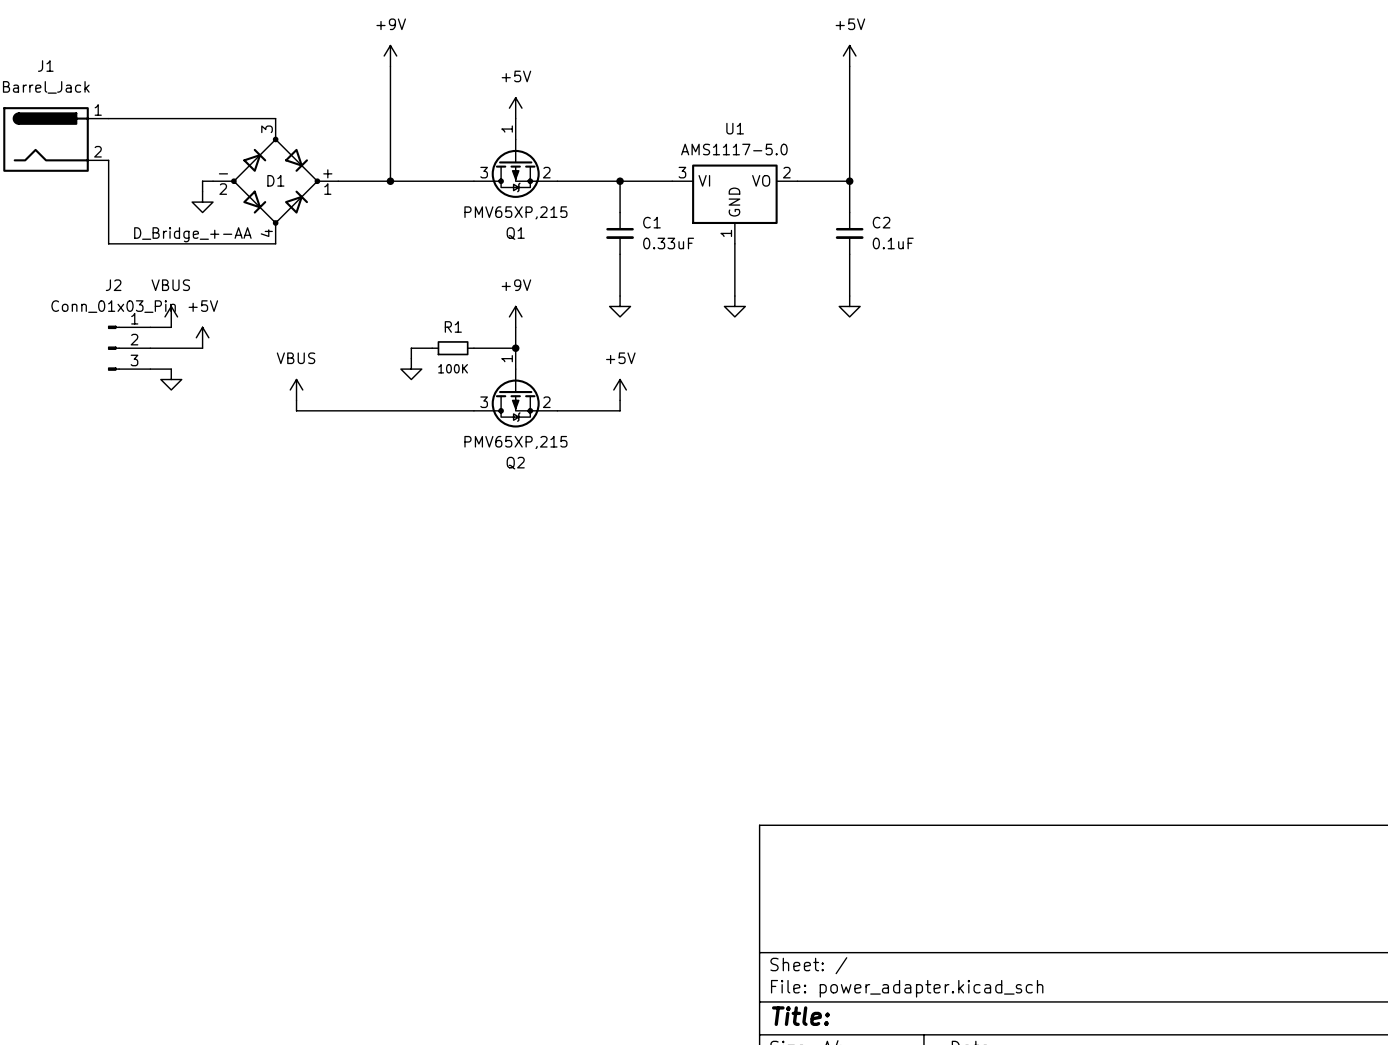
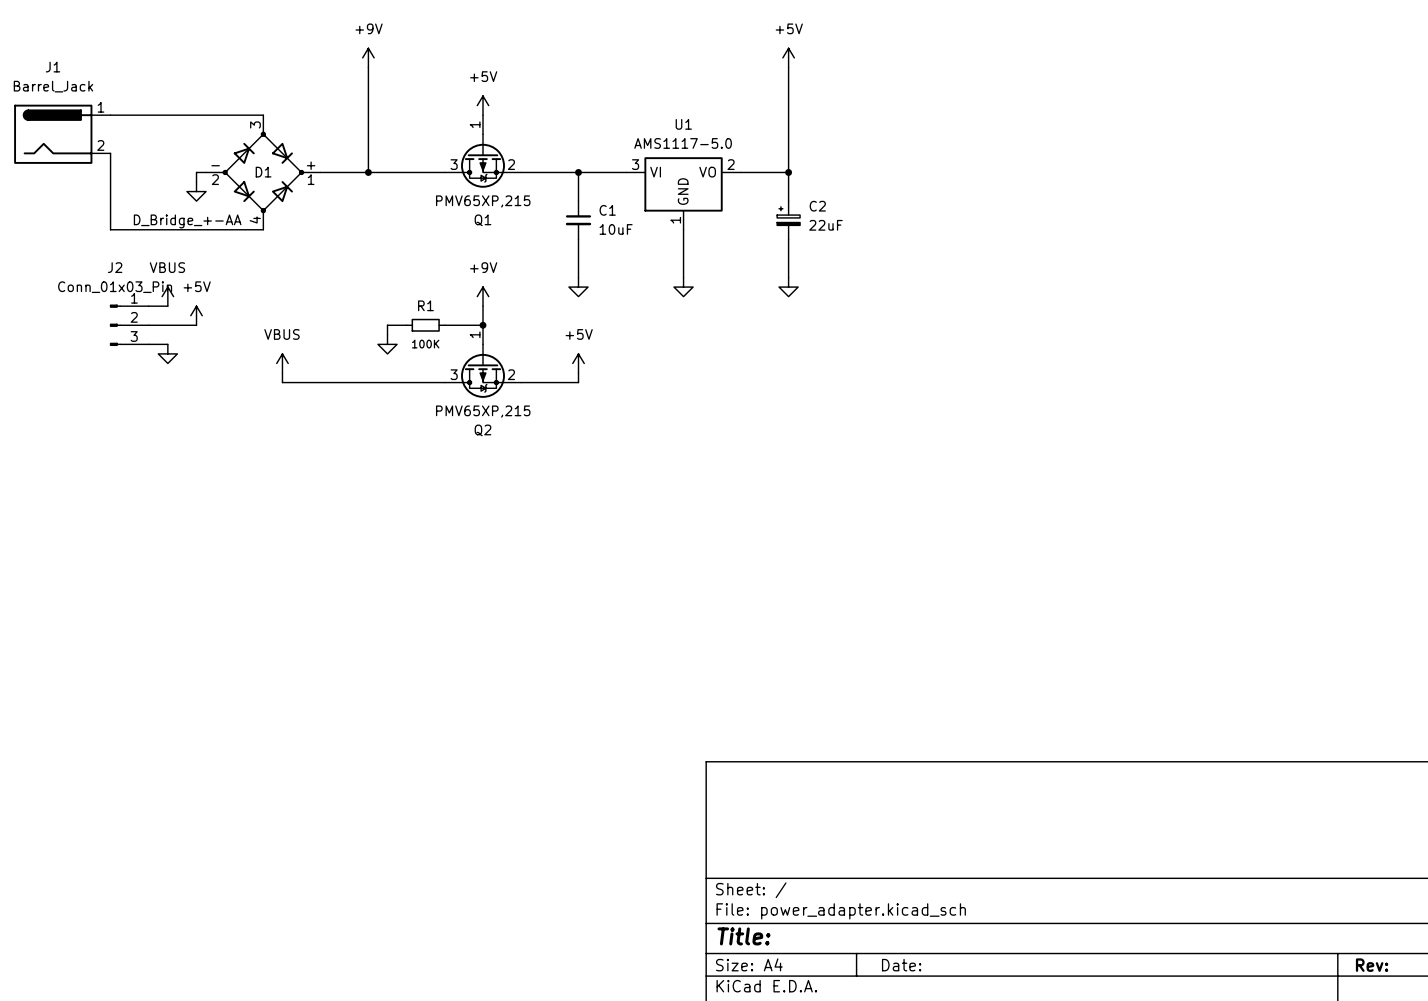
C2 symbol: [835, 212, 864, 255] -> [777, 201, 801, 240]
C1 value: 0.33uF (668, 243) -> 10uF (616, 229)
C2 value: 0.1uF (893, 243) -> 22uF (825, 225)

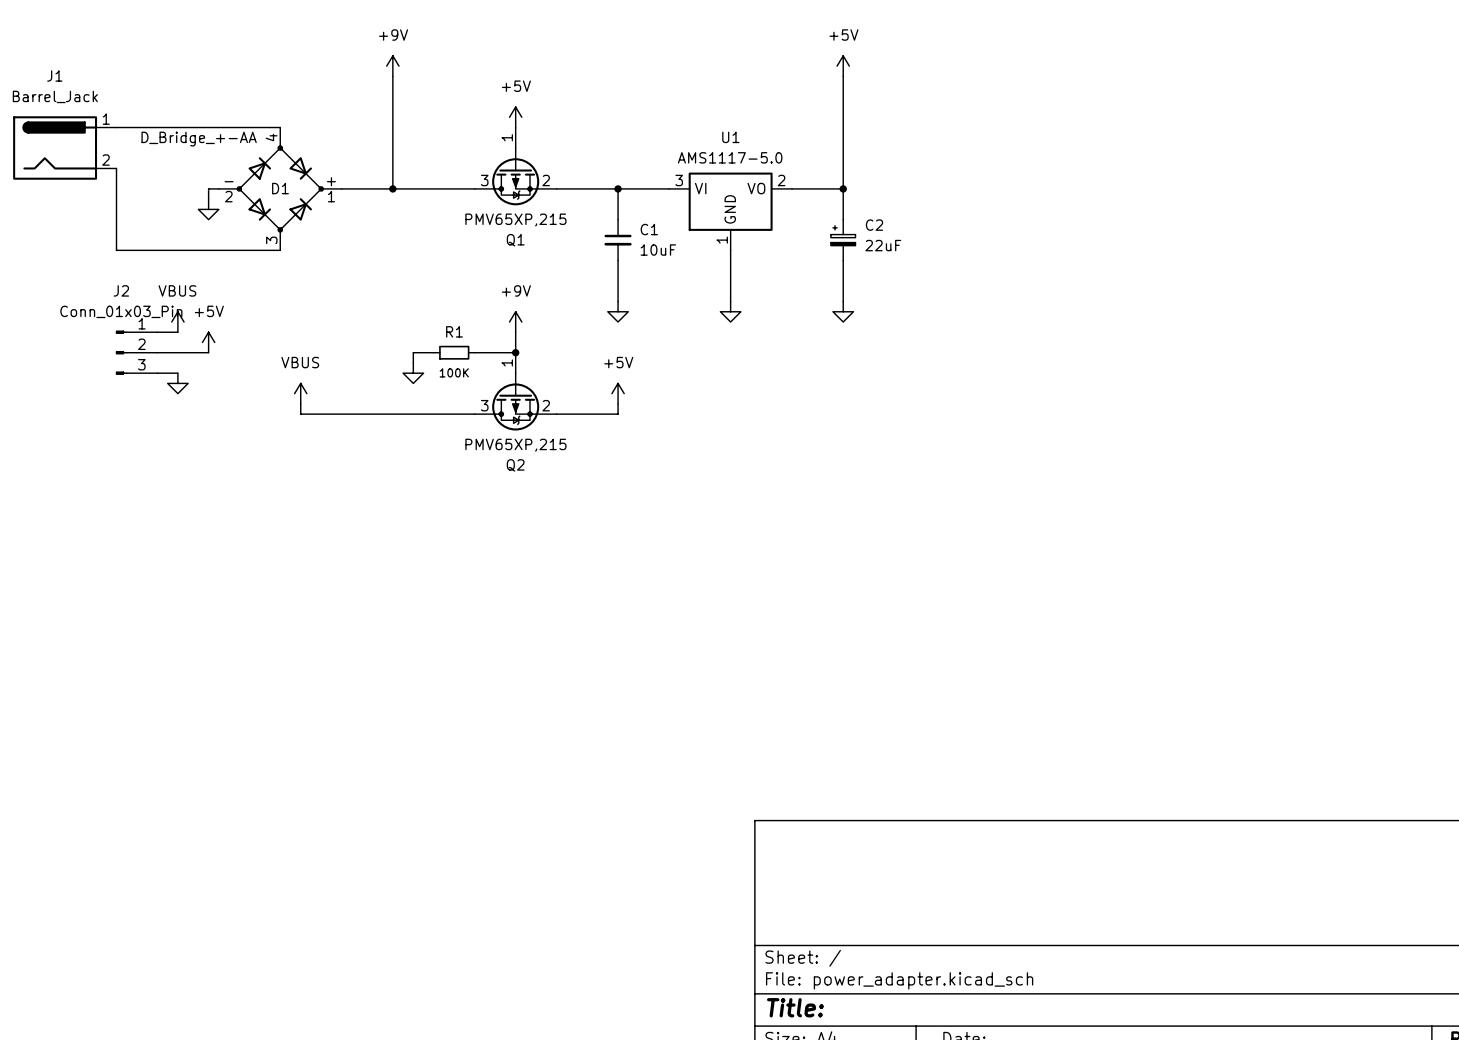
D1 flip: as is (263, 172) -> up-down (280, 188)

